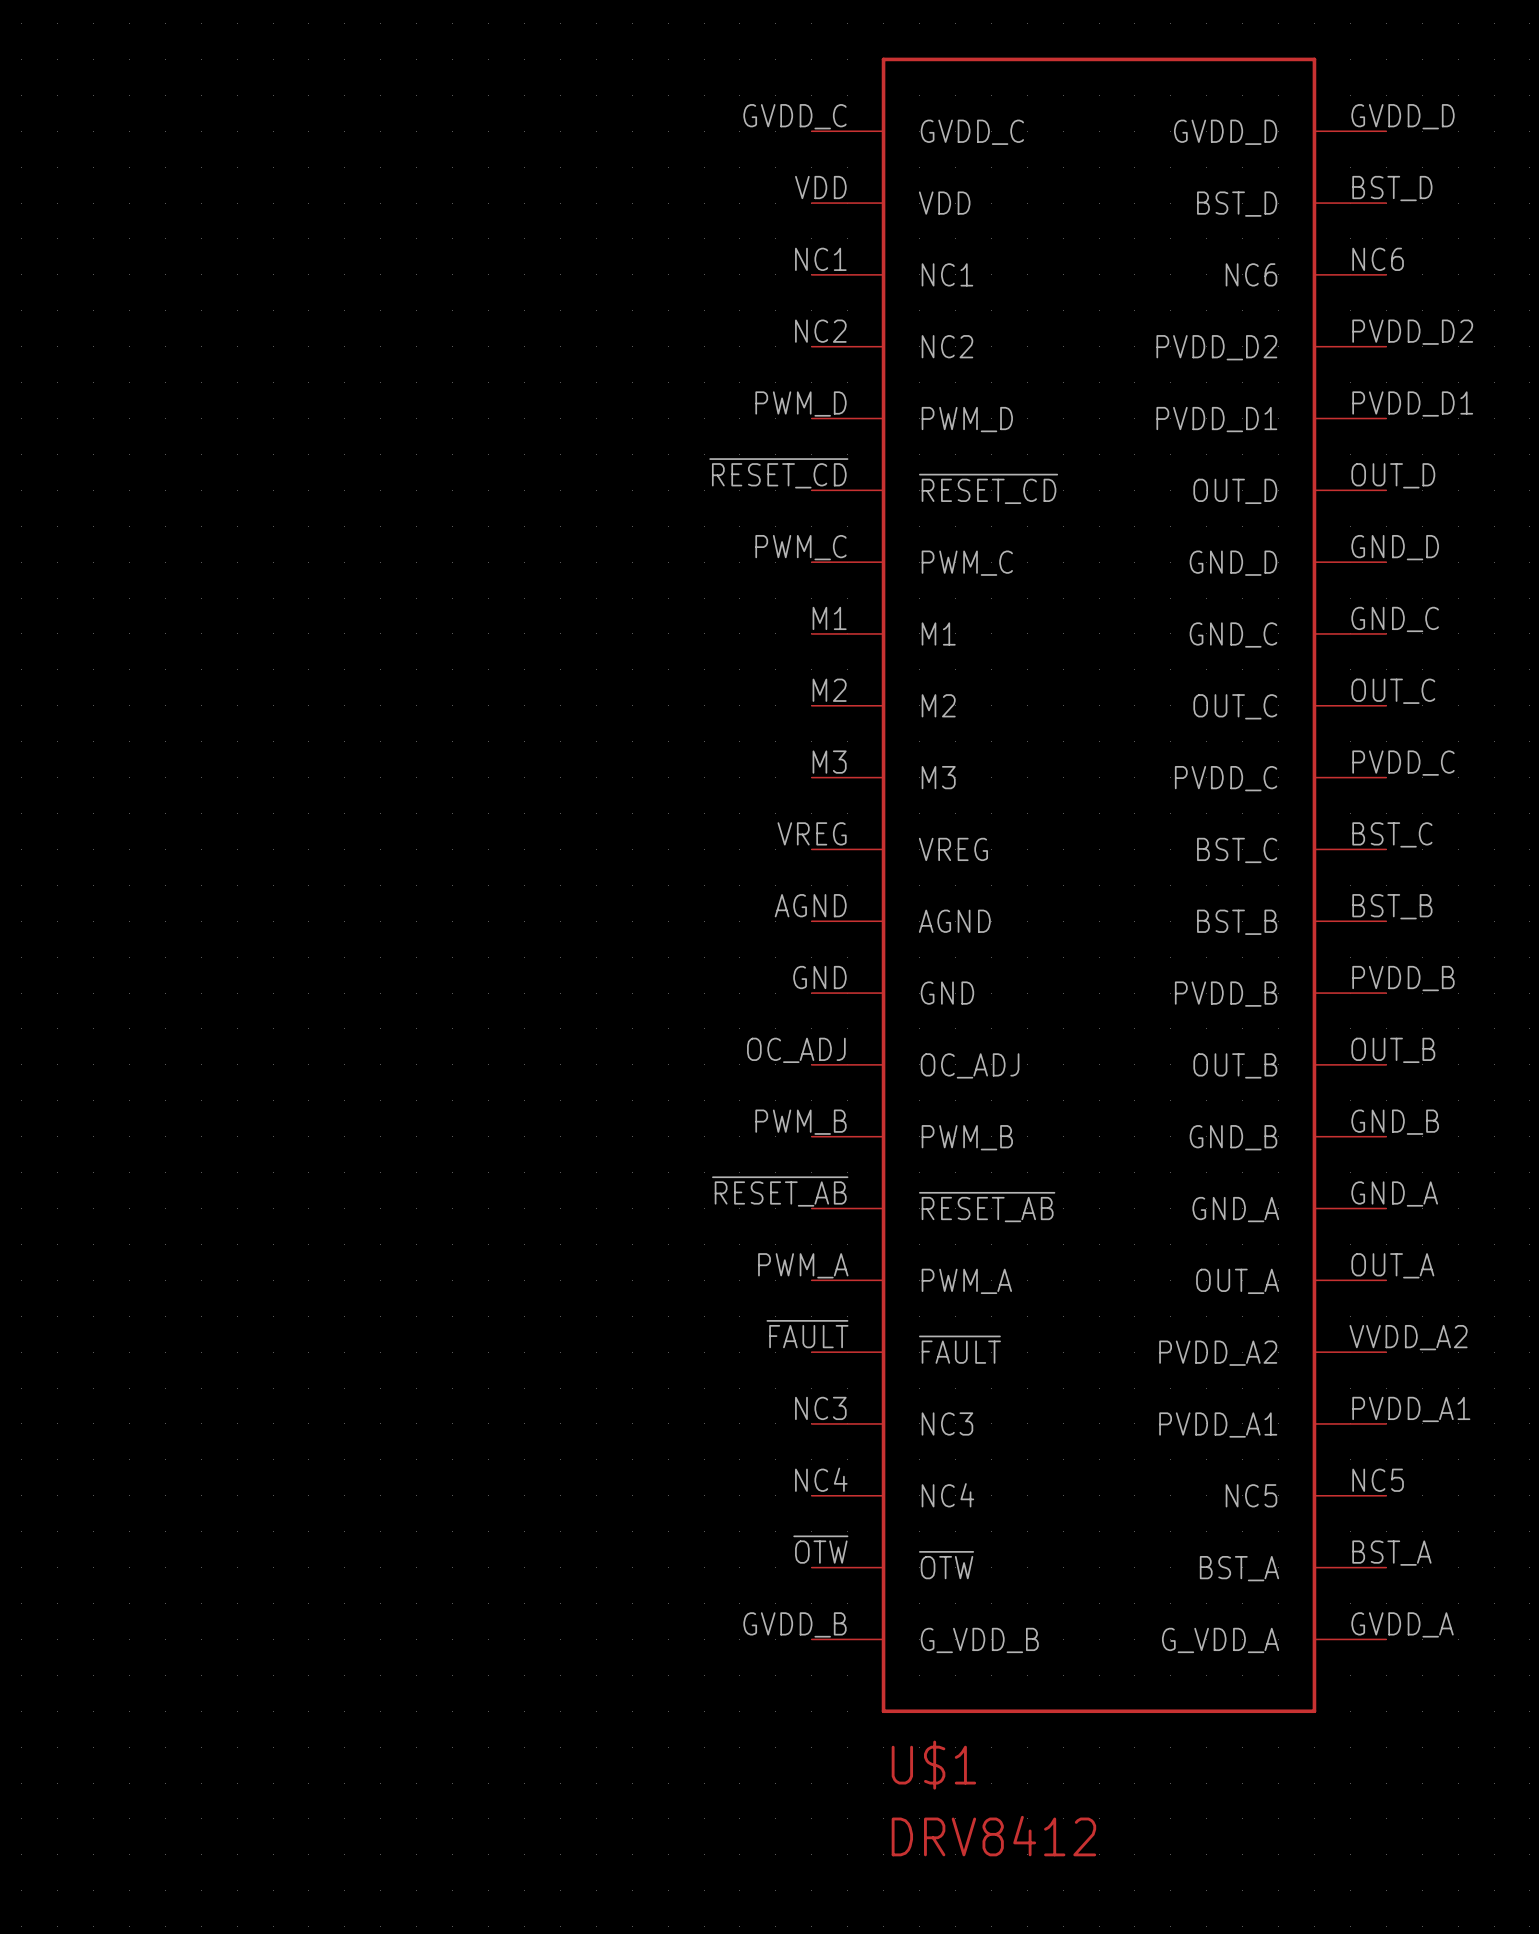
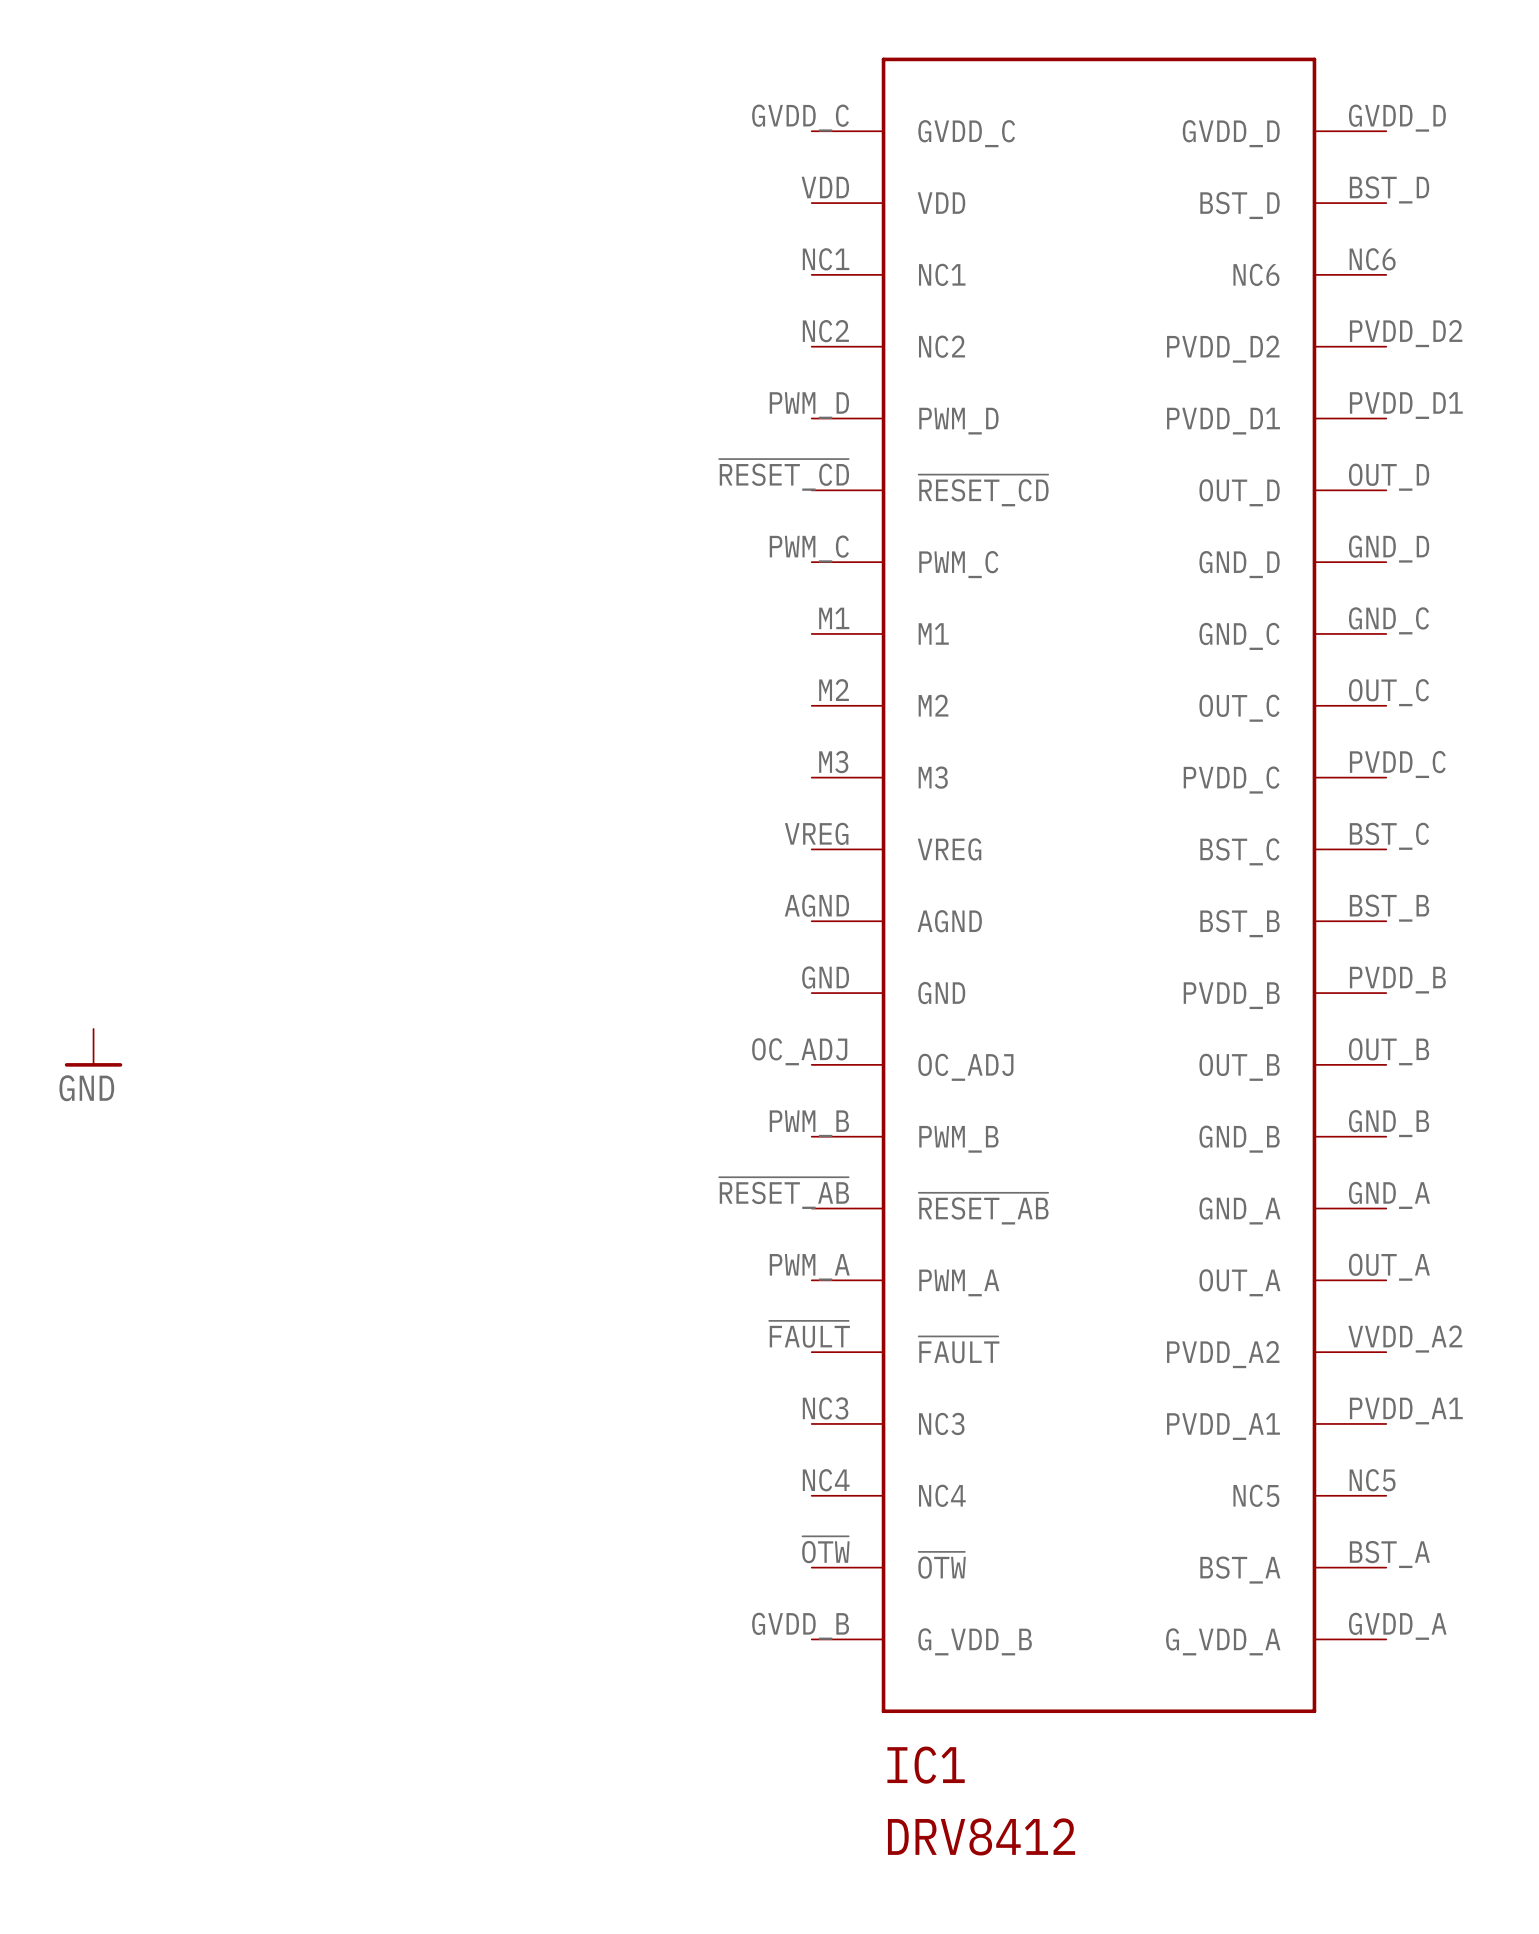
power symbol: none -> GND (93, 1047)
U$1 name: U$1 (933, 1765) -> IC1 (926, 1765)

